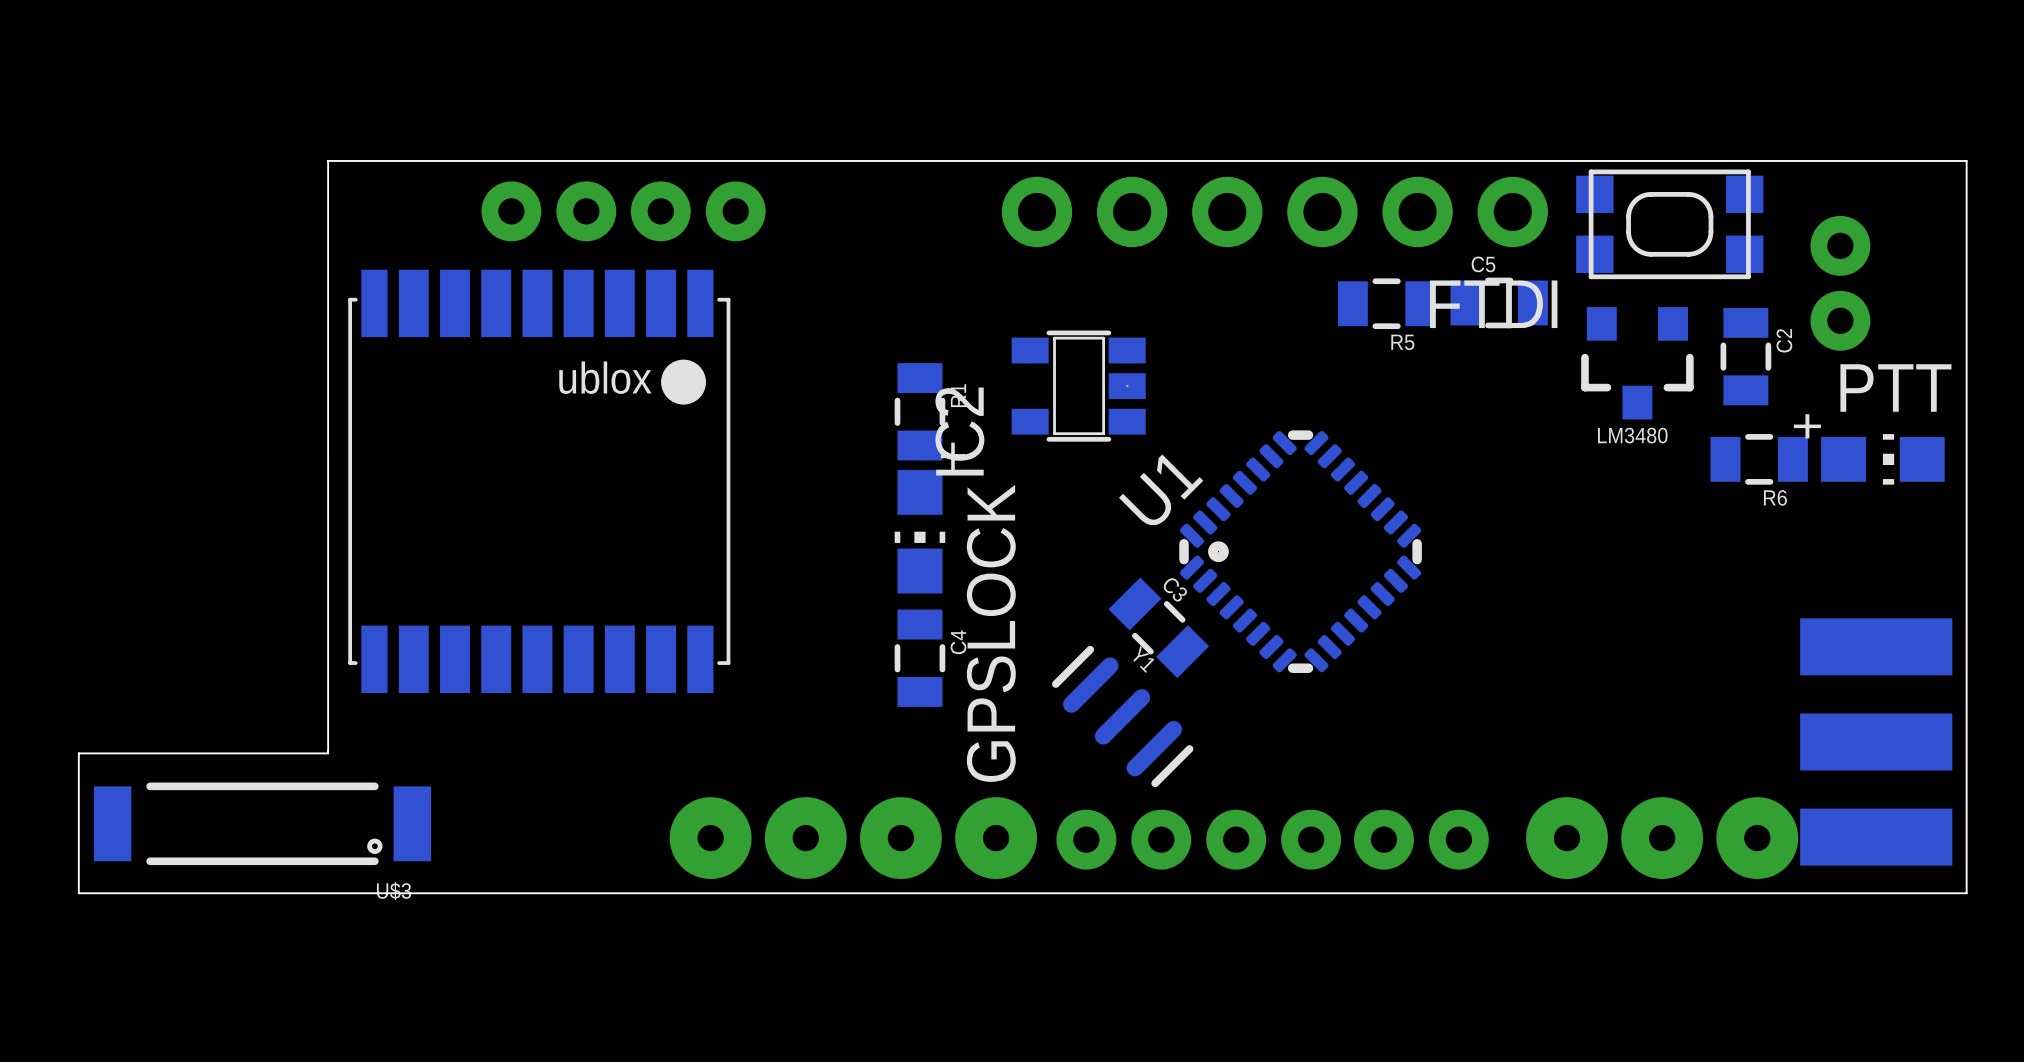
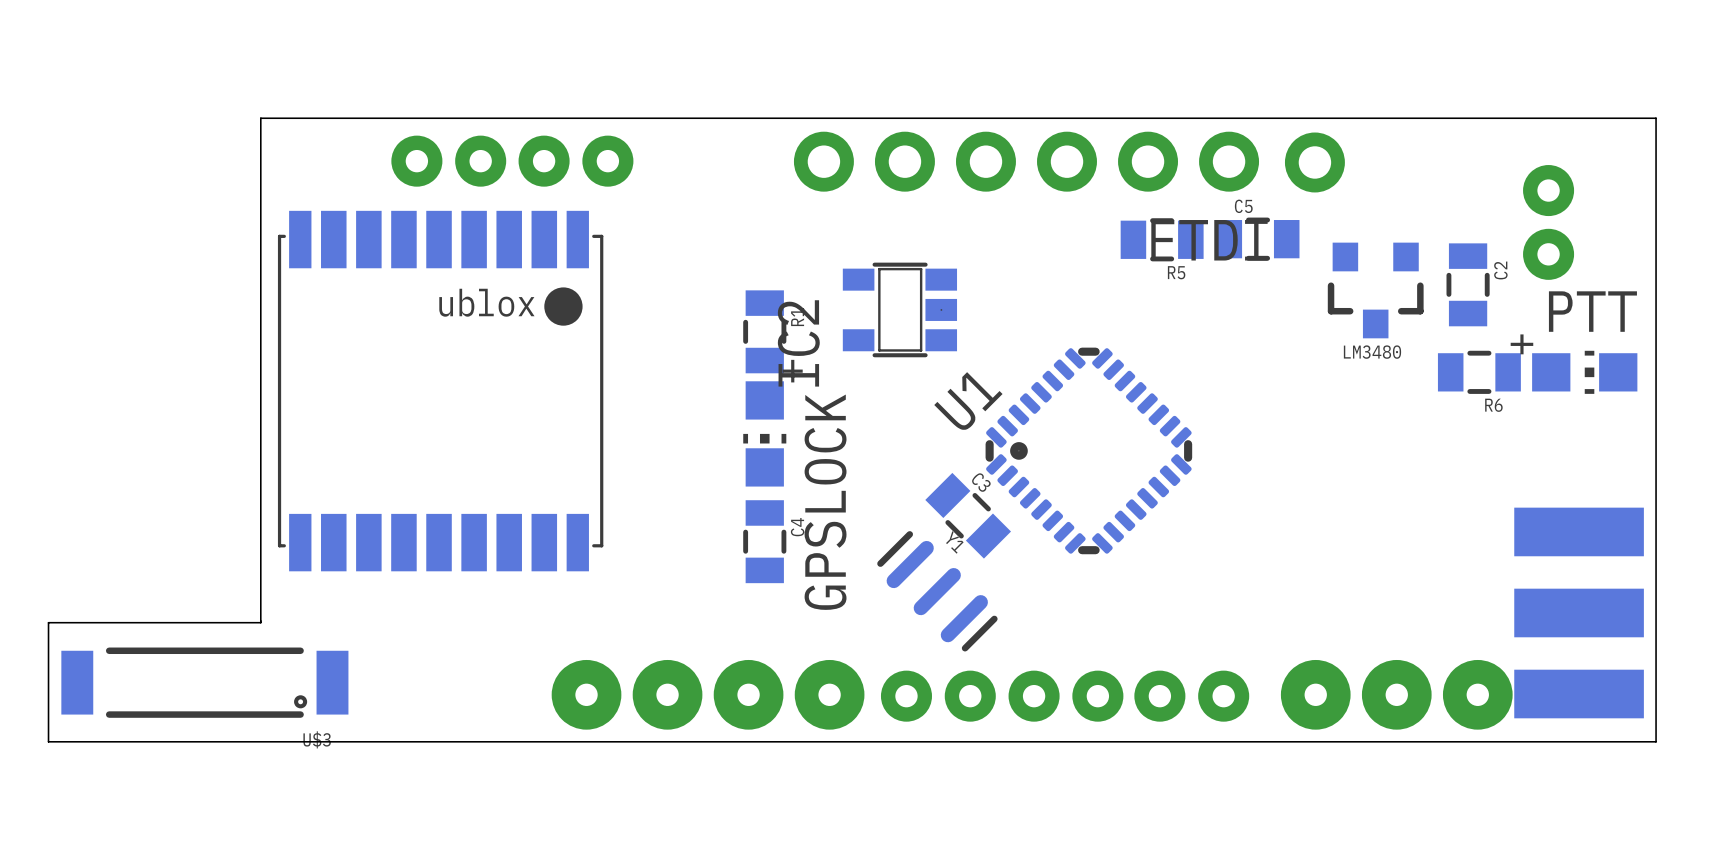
FTDI position: (1274, 211) -> (1026, 161)
part: none -> (1314, 162)
part: (1669, 224) -> none

